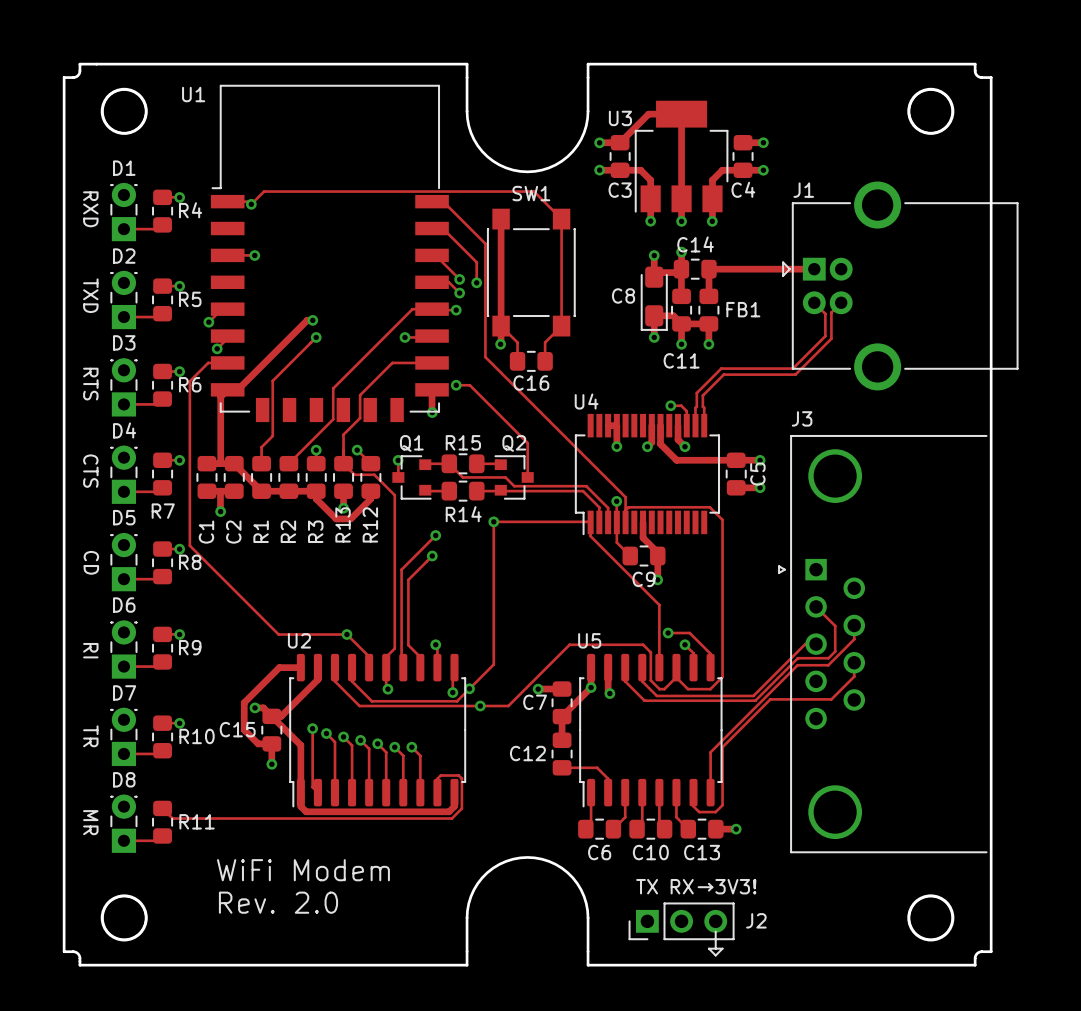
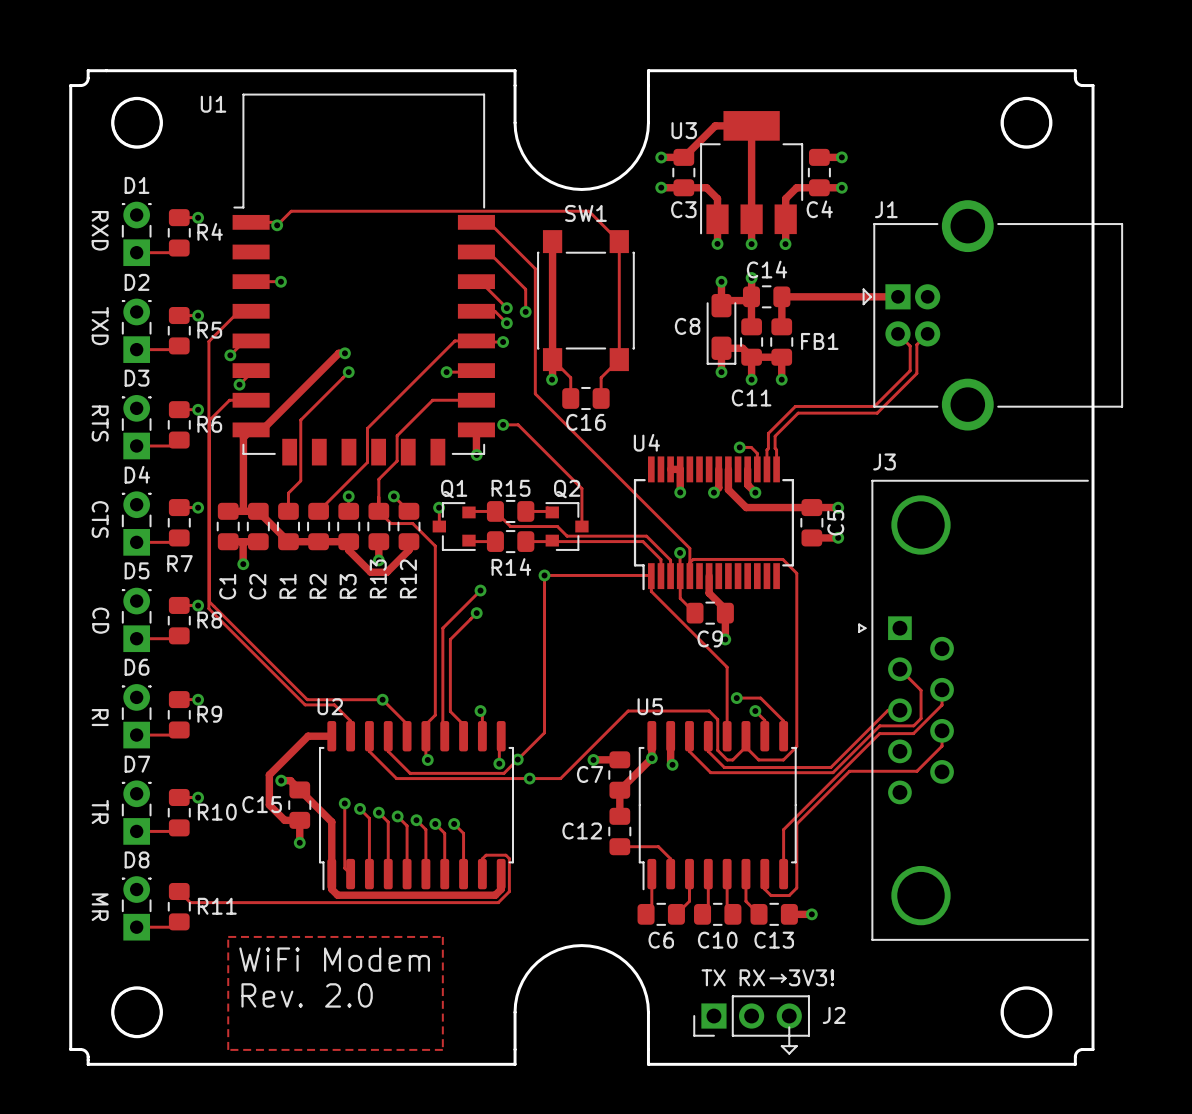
track: (317, 667) (317, 679) (281, 716) (271, 716) -> (350, 736) (350, 721) (334, 704) (305, 704) (208, 608) (208, 341) (239, 311) (251, 311)
zone outline: none -> (228, 936) (228, 1049) (442, 1049) (442, 936) (228, 936)

